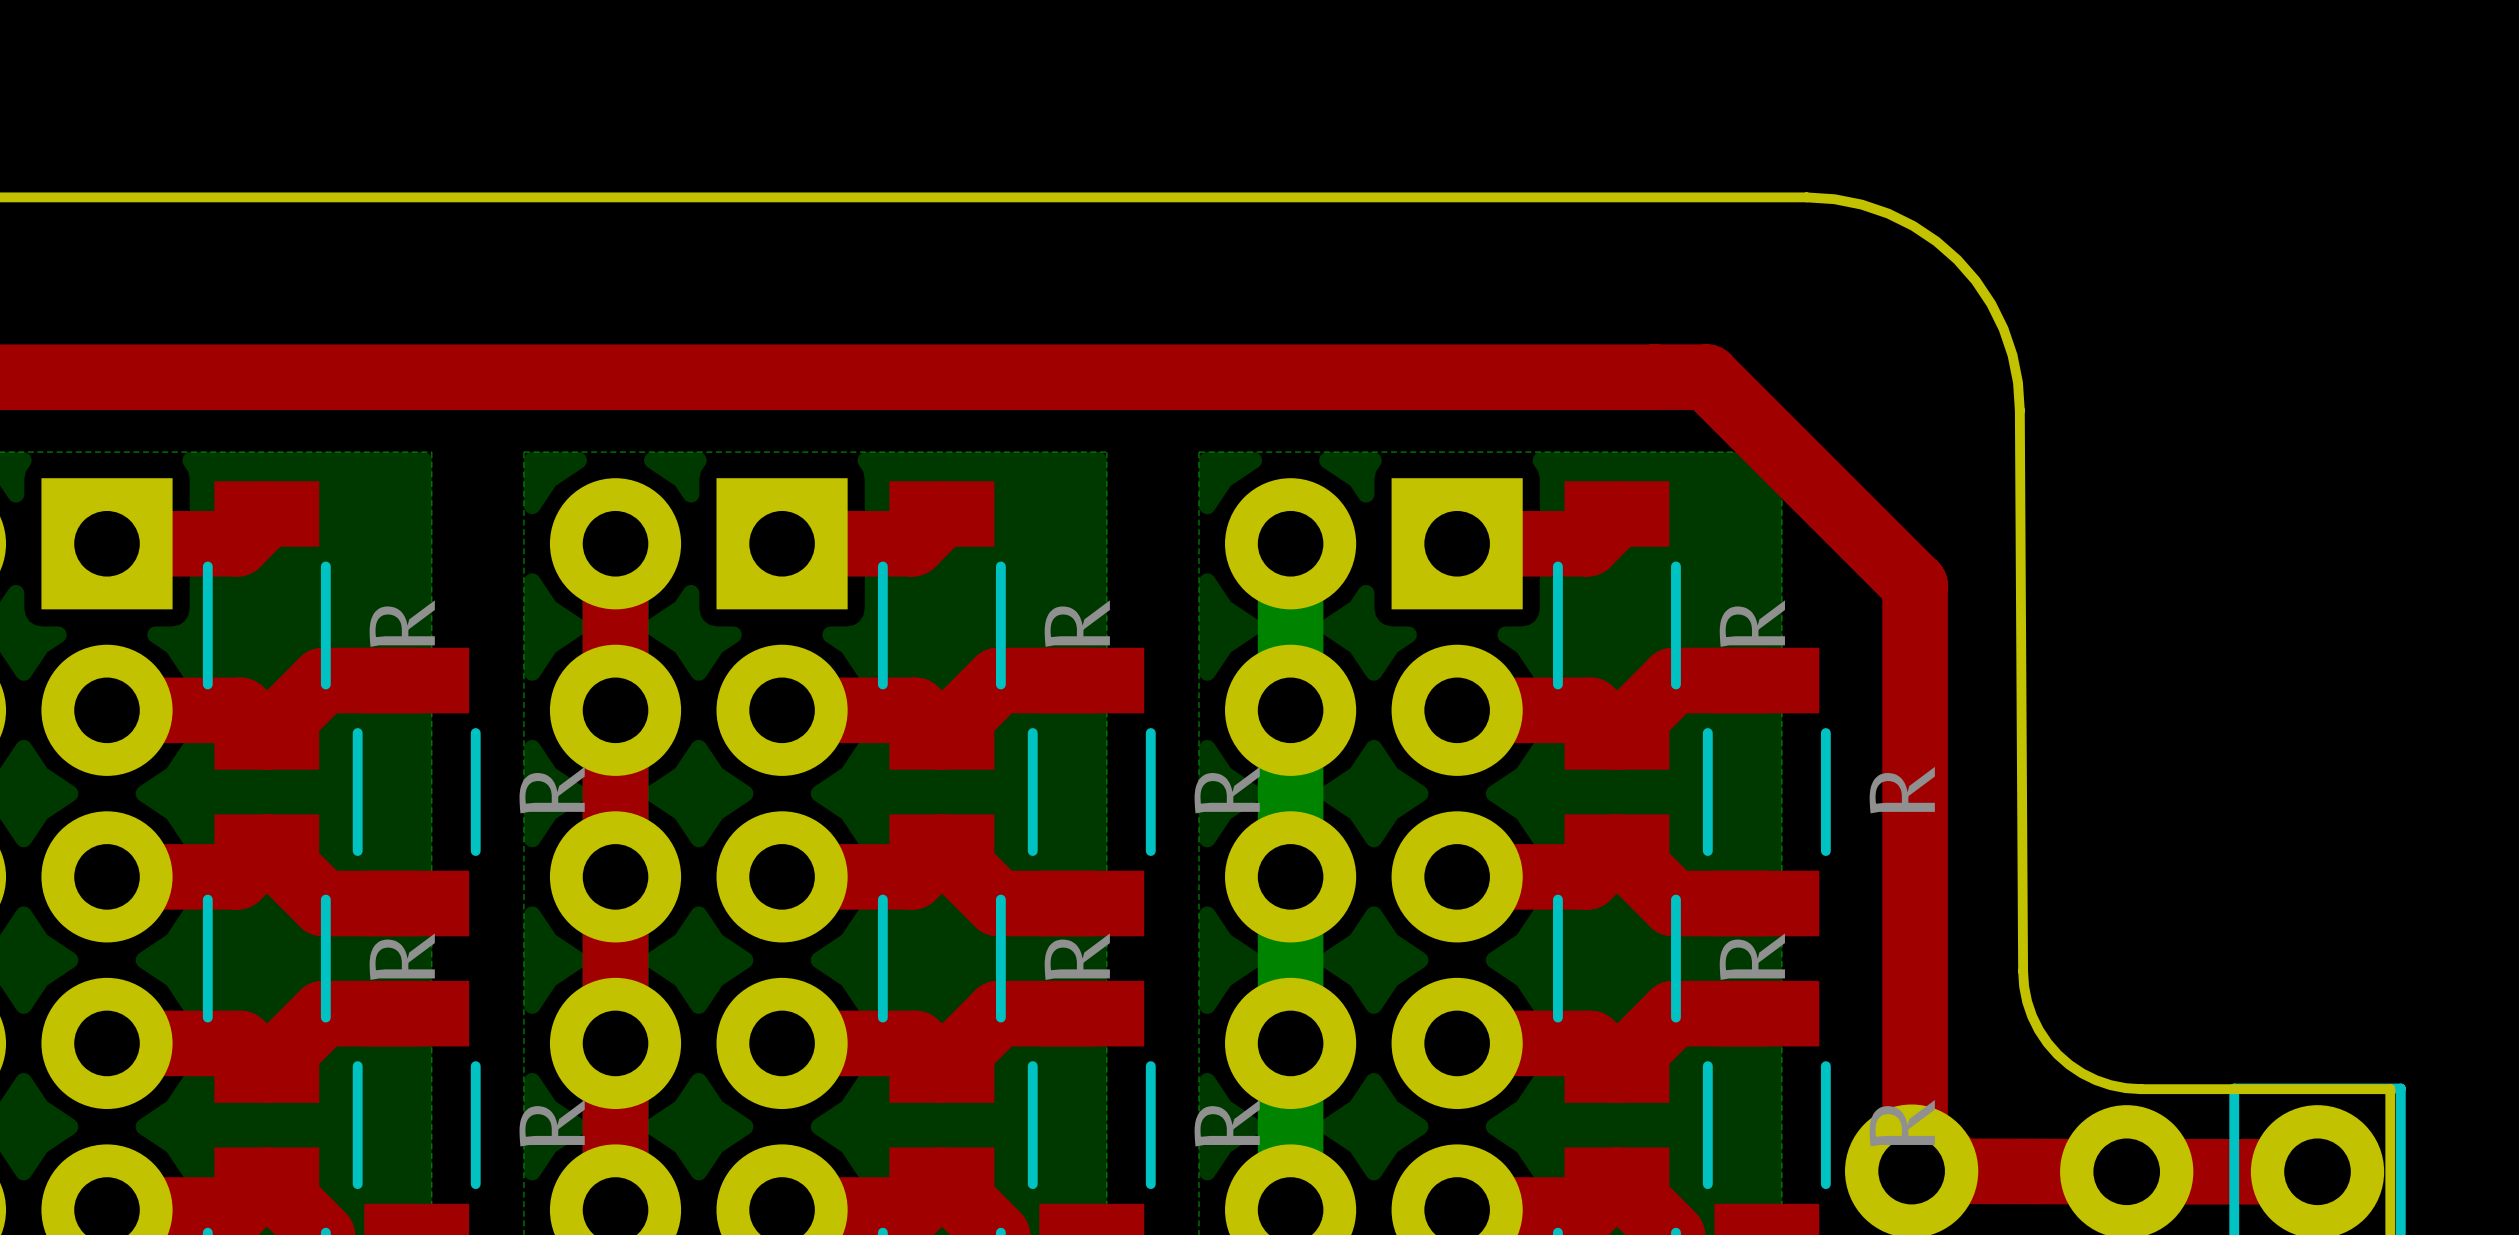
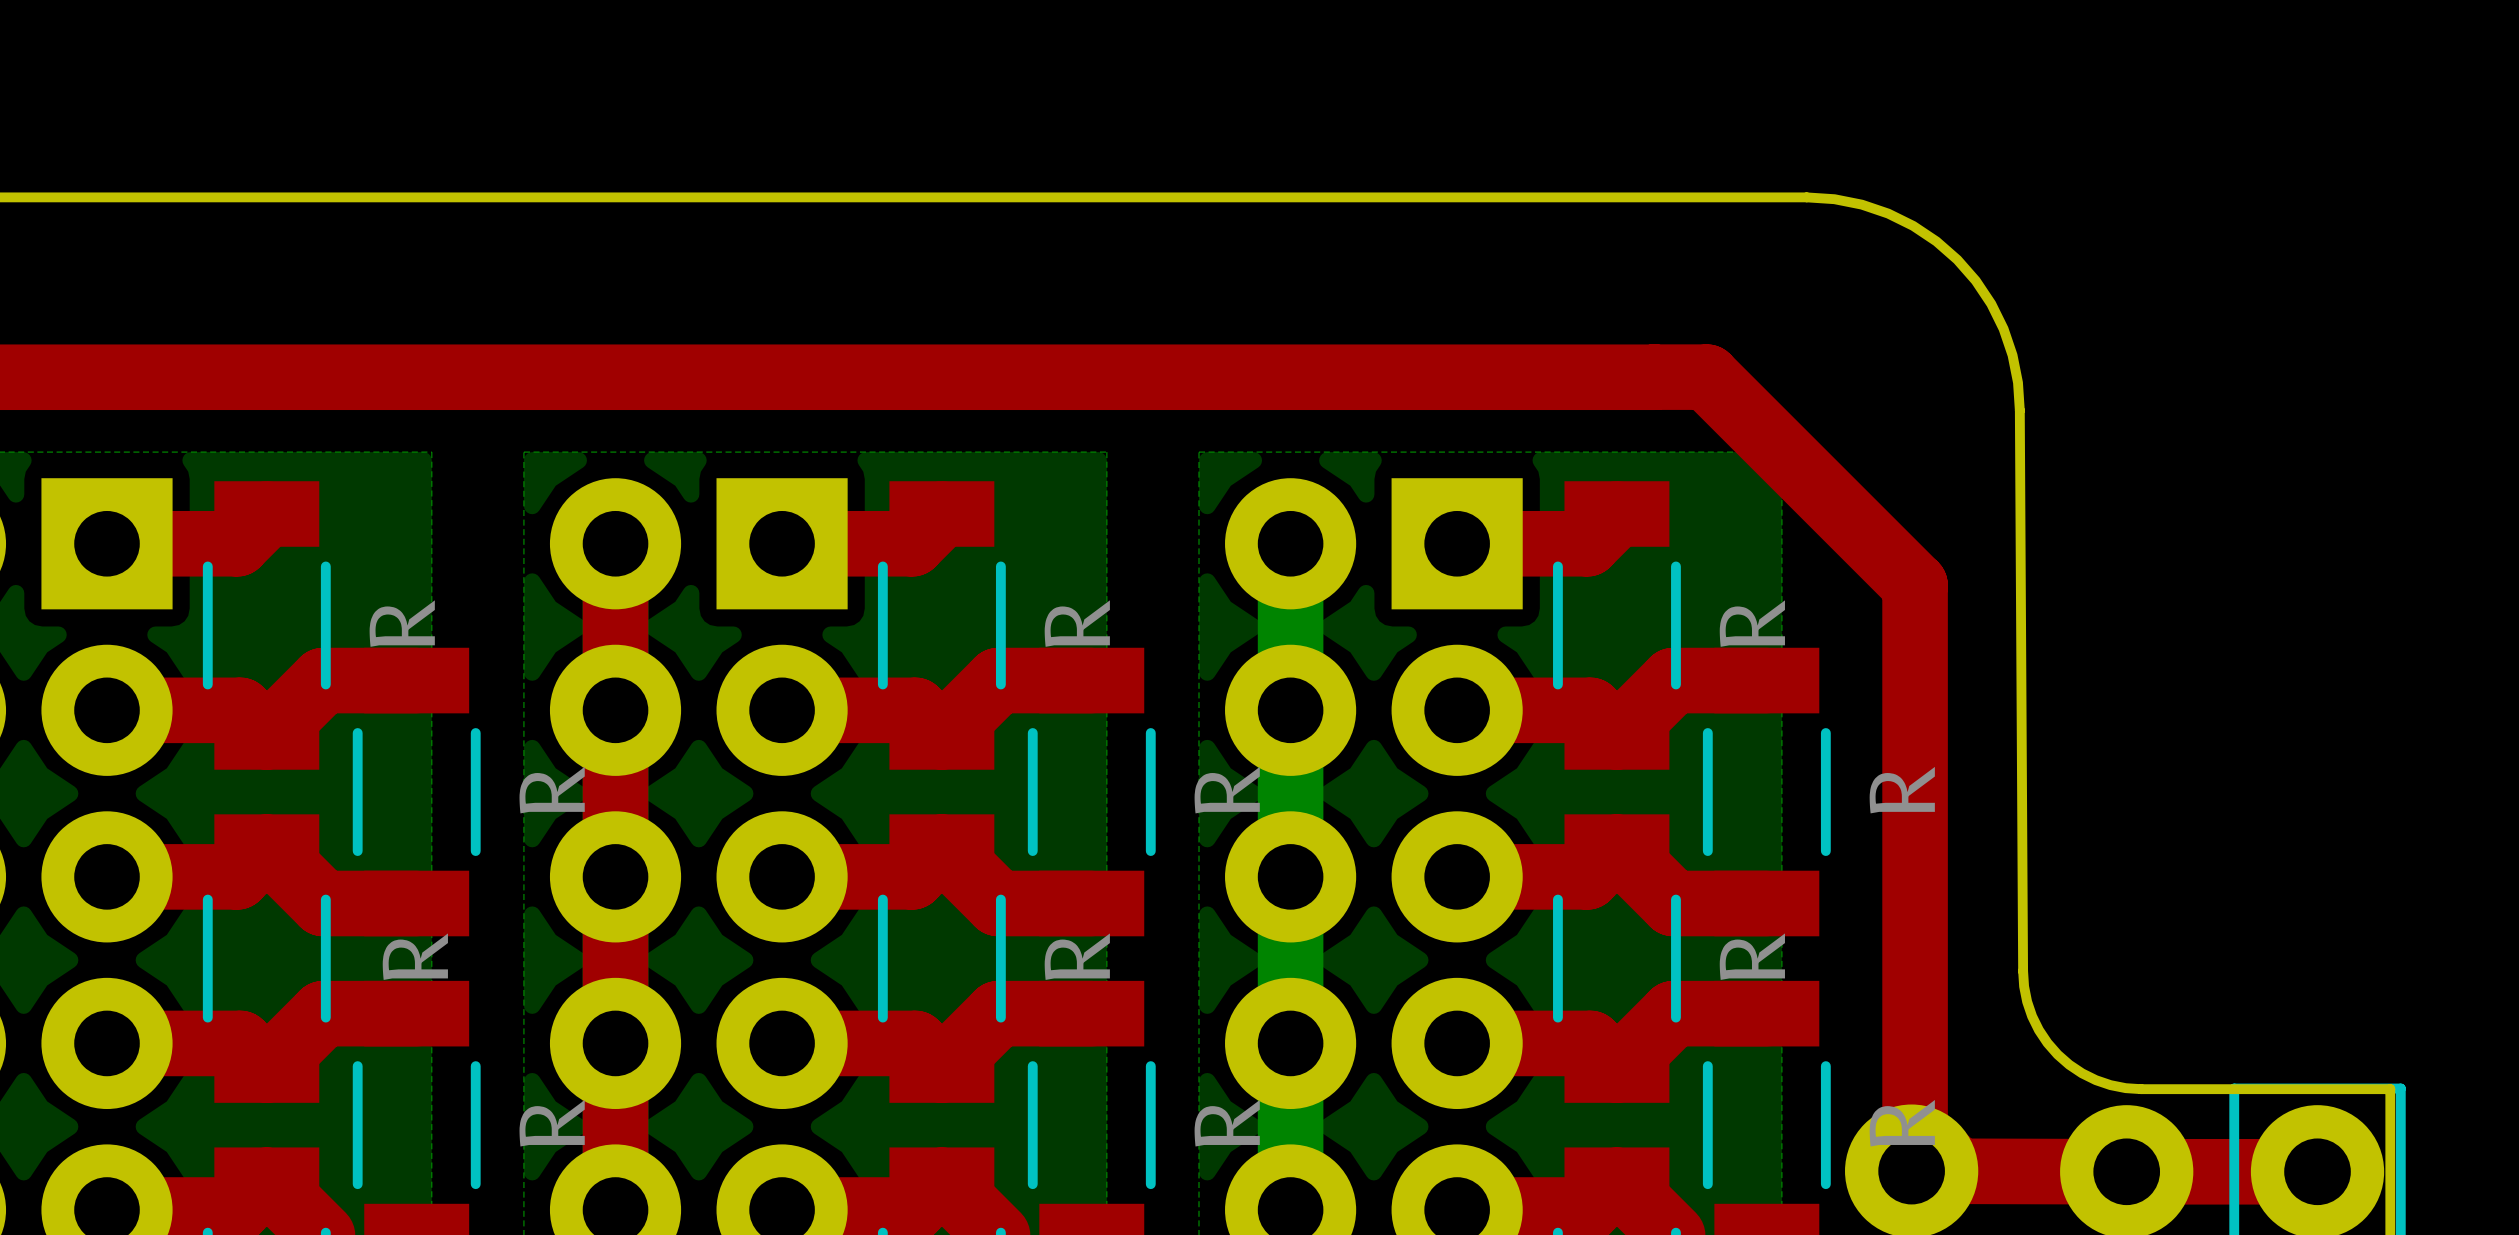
part value position: R (402, 956) -> R (415, 956)

